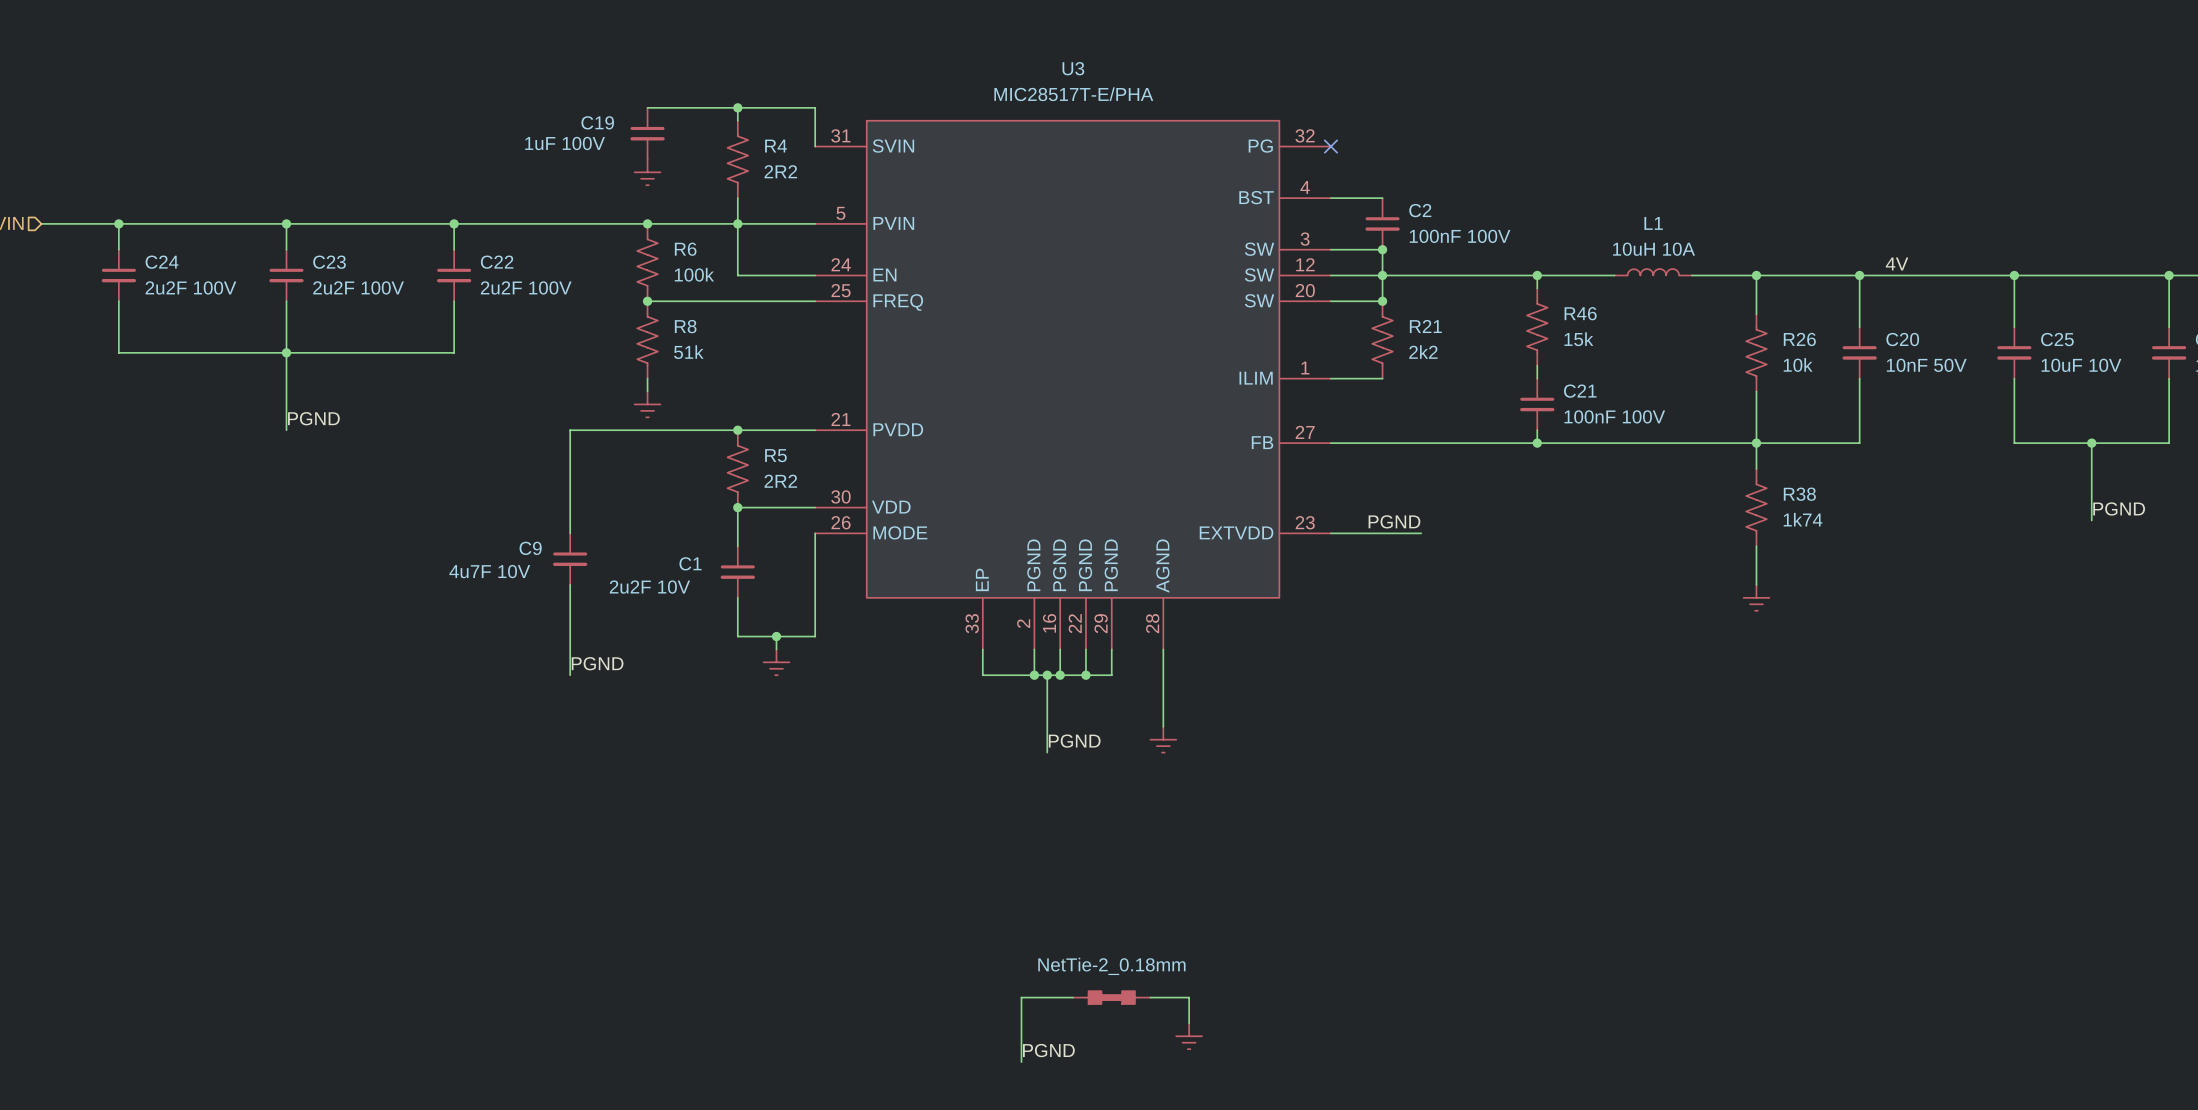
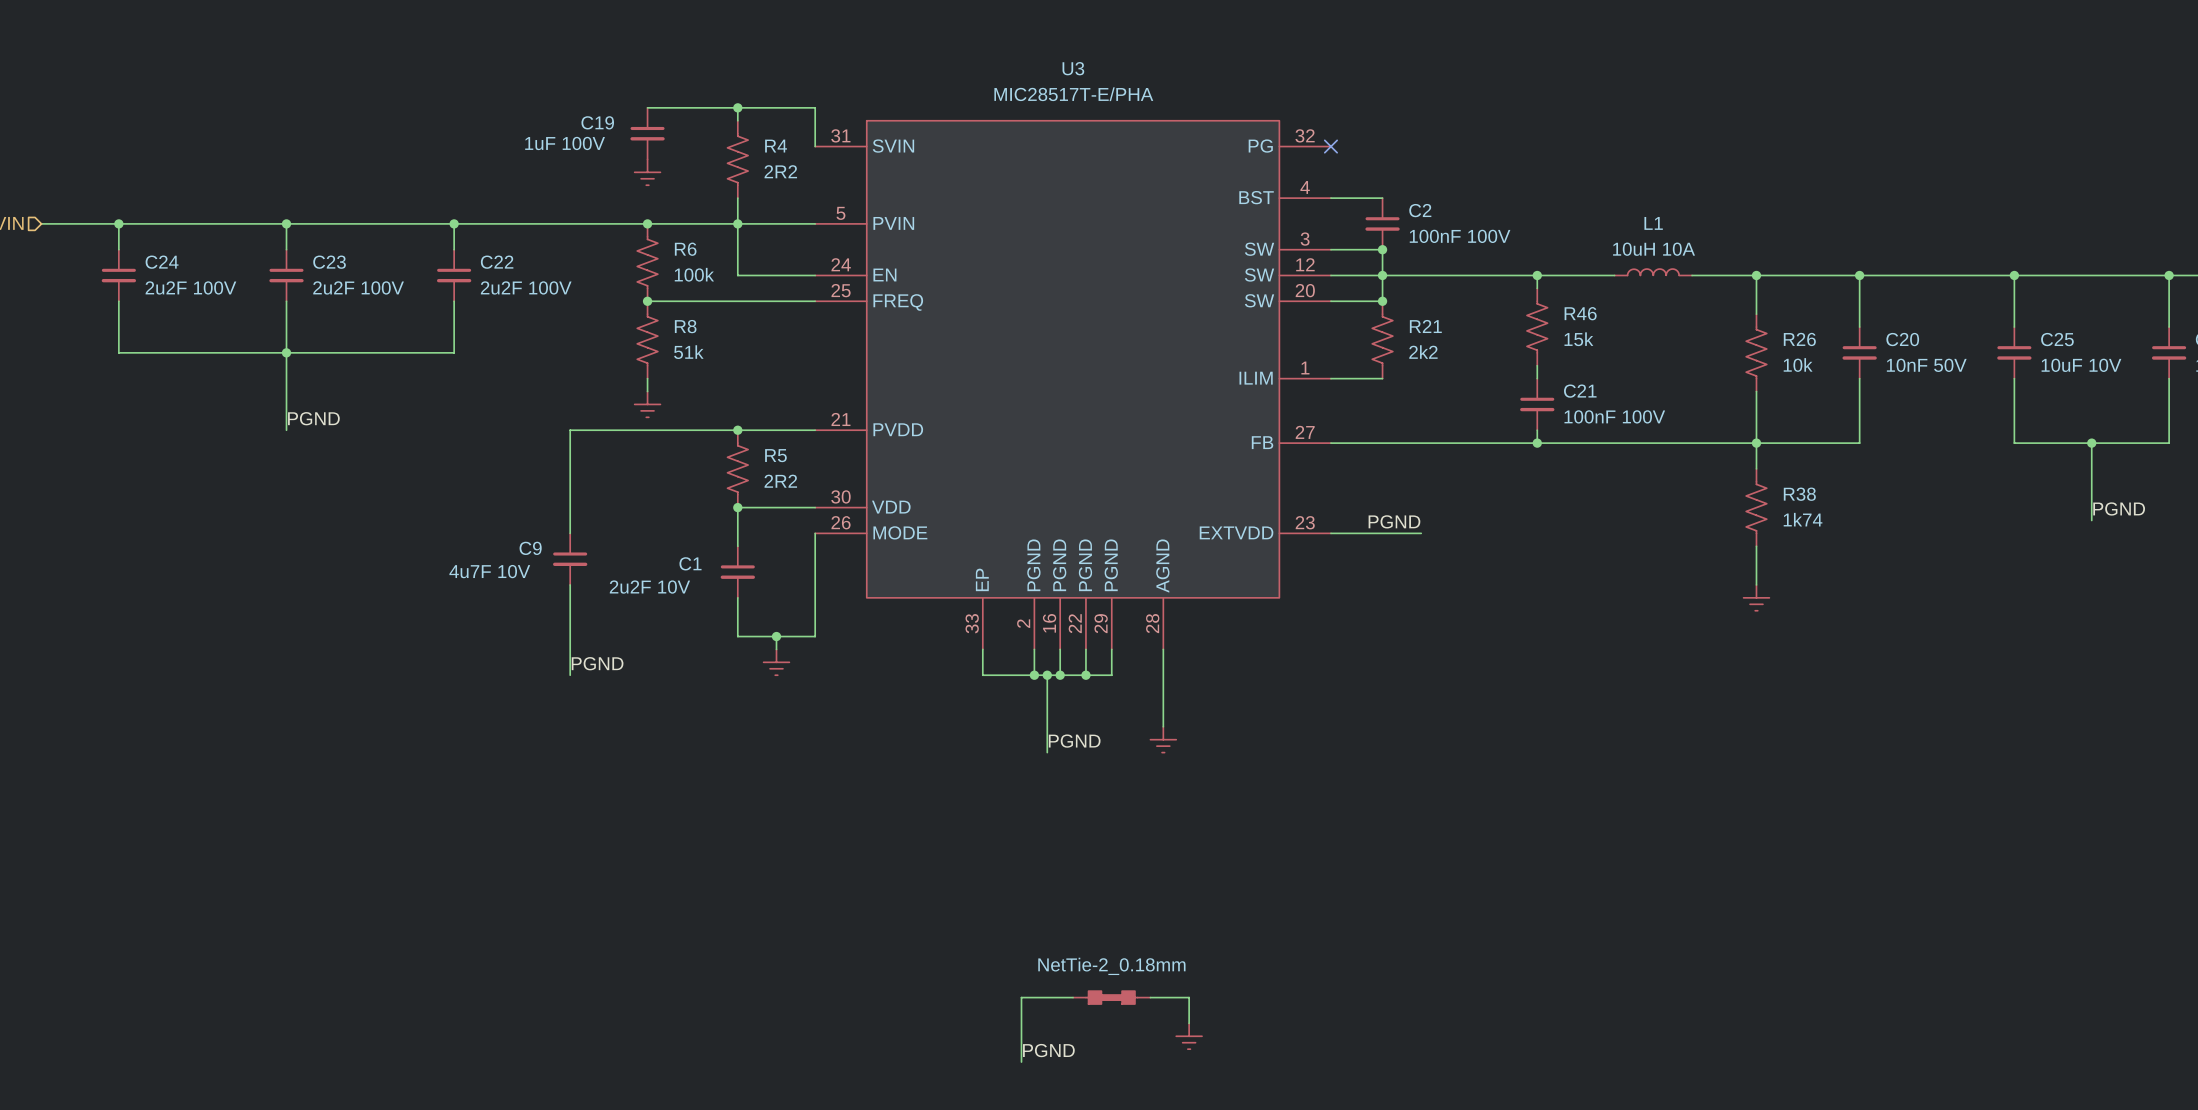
label: 4V (1897, 263) -> none

